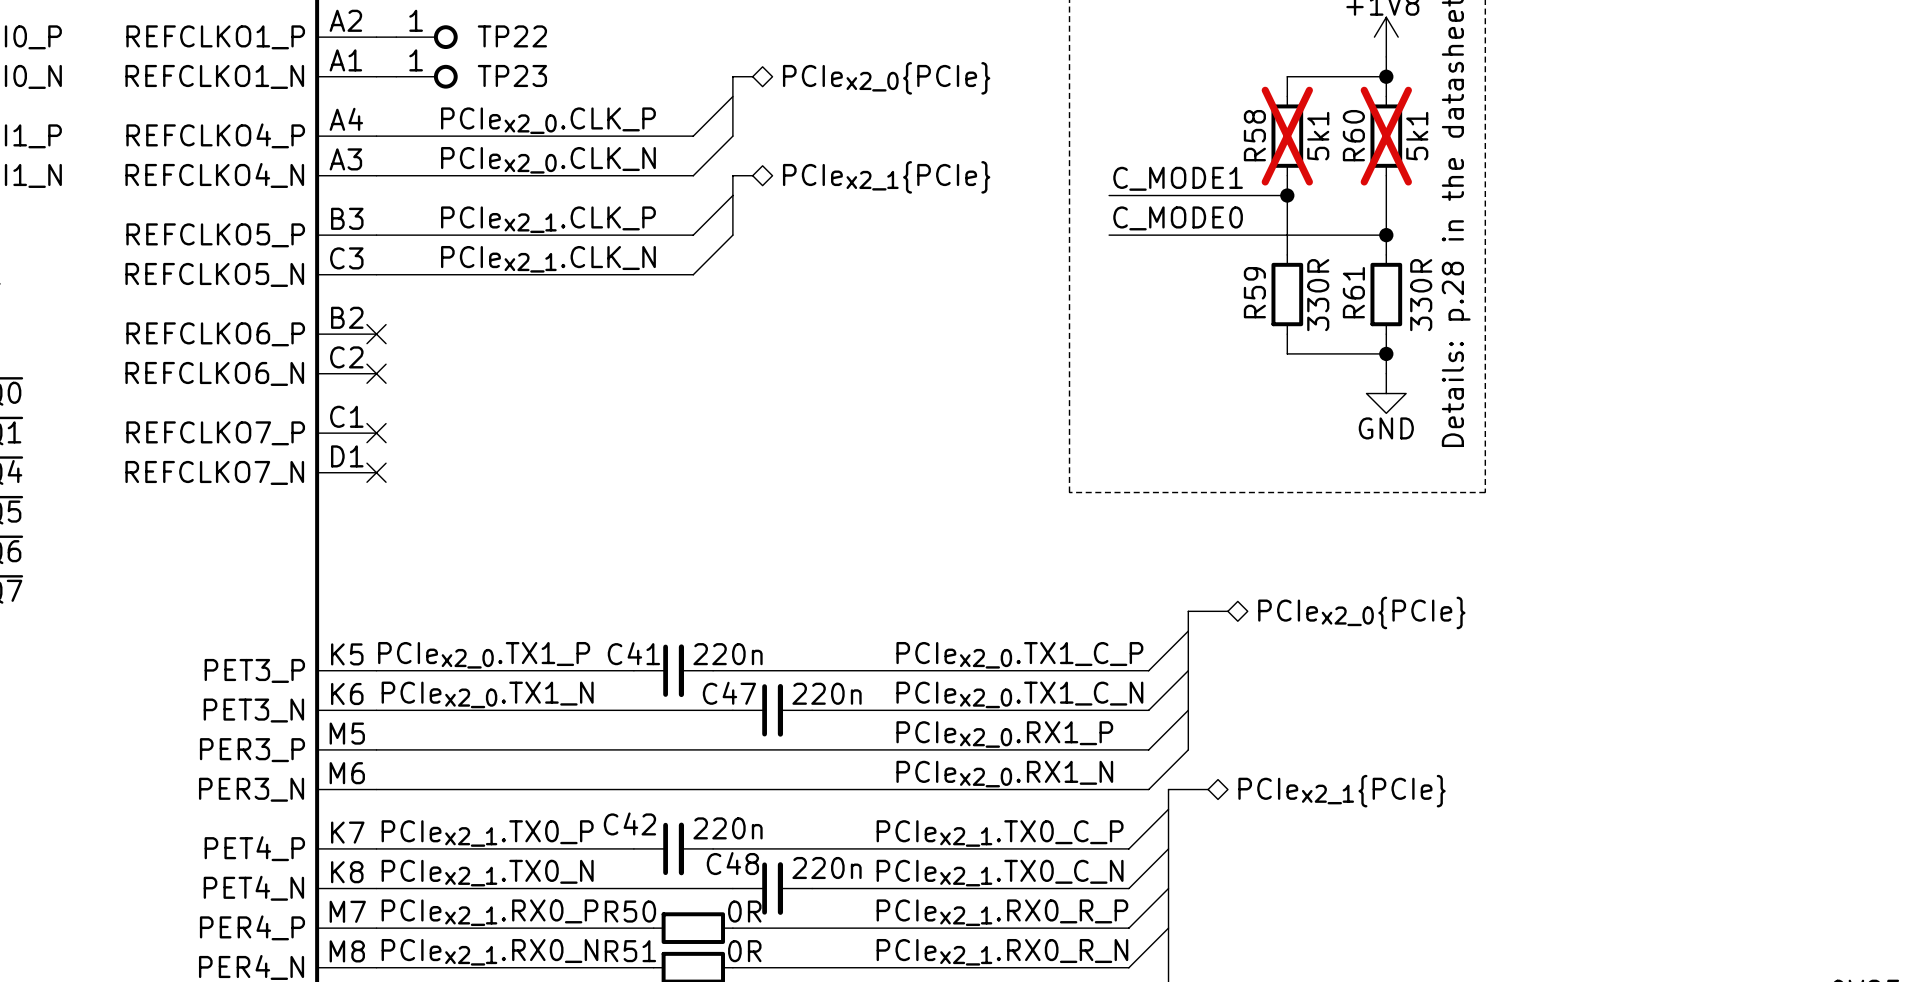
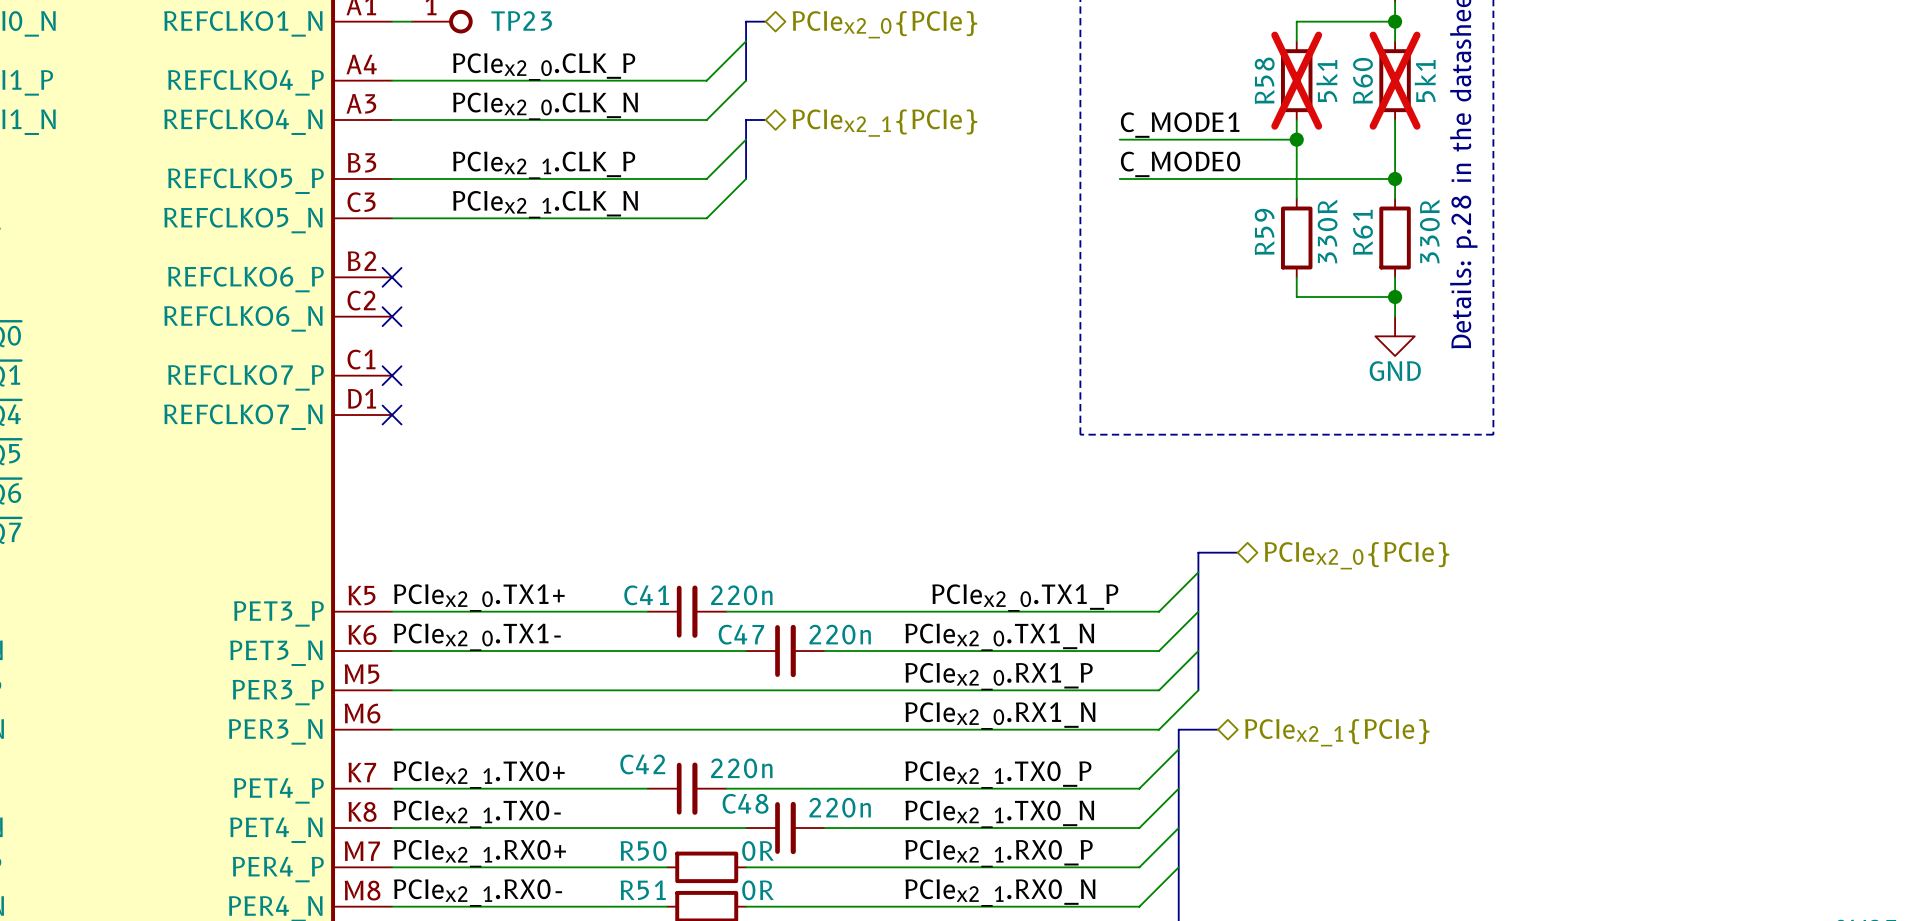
label: PCIex2_0.TX1_P (484, 655) -> PCIex2_0.TX1+ (479, 597)
label: PCIex2_0.TX1_C_P (1019, 655) -> PCIex2_0.TX1_P (1025, 597)
label: PCIex2_0.TX1_N (487, 694) -> PCIex2_0.TX1- (477, 637)
label: PCIex2_0.TX1_C_N (1019, 694) -> PCIex2_0.TX1_N (999, 637)
label: PCIex2_1.TX0_P (487, 833) -> PCIex2_1.TX0+ (479, 774)
label: PCIex2_1.TX0_C_P (1000, 833) -> PCIex2_1.TX0_P (998, 774)
label: PCIex2_1.TX0_N (487, 873) -> PCIex2_1.TX0- (477, 814)
label: PCIex2_1.TX0_C_N (1000, 873) -> PCIex2_1.TX0_N (999, 814)
label: PCIex2_1.RX0_P (489, 912) -> PCIex2_1.RX0+ (480, 853)
label: PCIex2_1.RX0_R_P (1002, 912) -> PCIex2_1.RX0_P (999, 853)
label: PCIex2_1.RX0_N (489, 952) -> PCIex2_1.RX0- (478, 892)
label: PCIex2_1.RX0_R_N (1002, 952) -> PCIex2_1.RX0_N (1000, 892)

